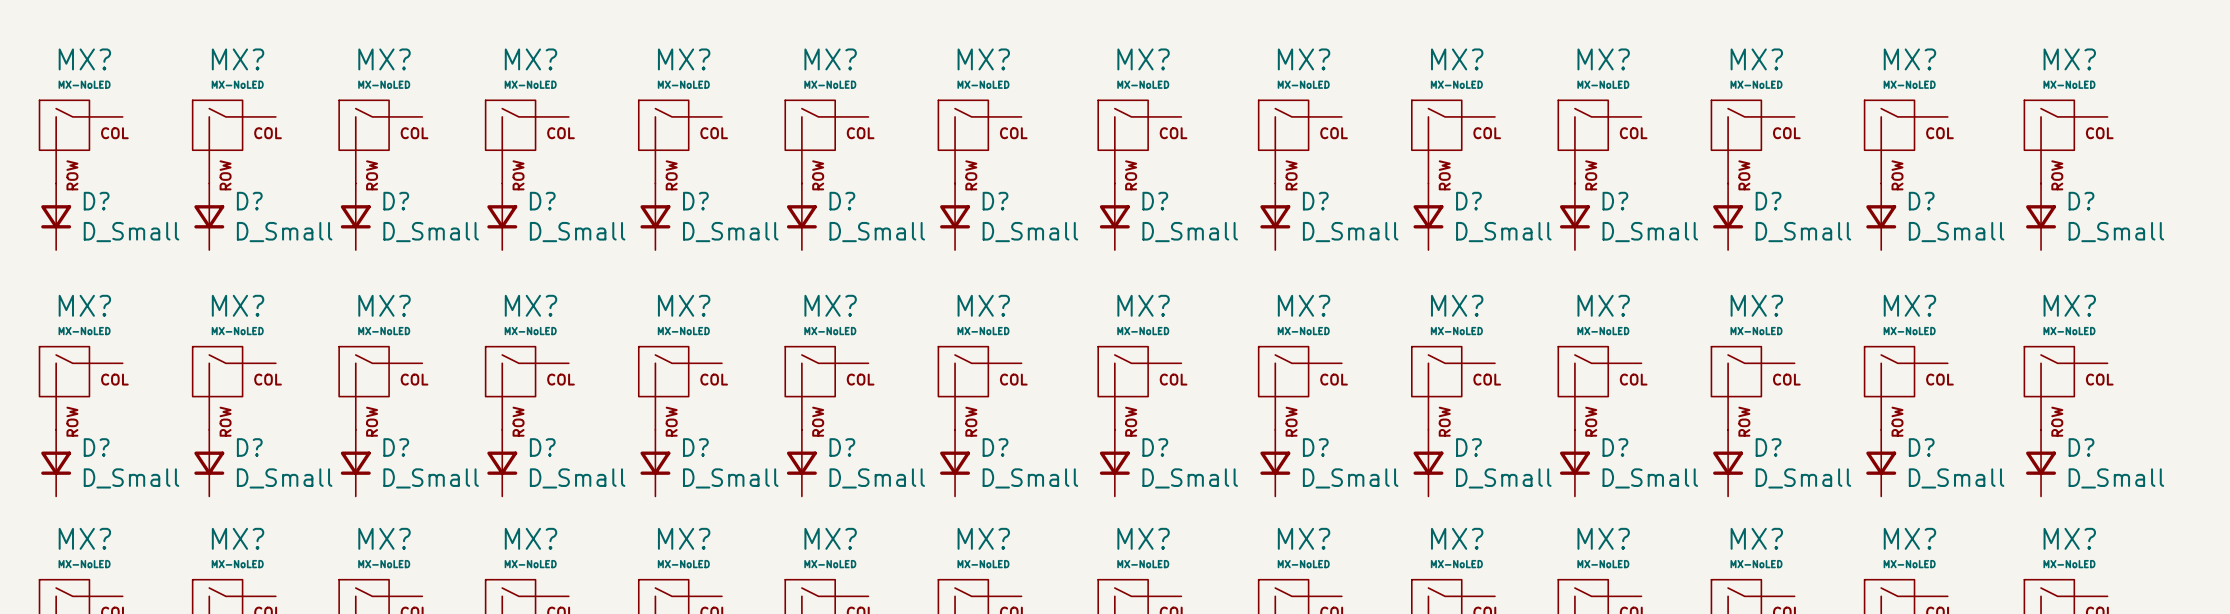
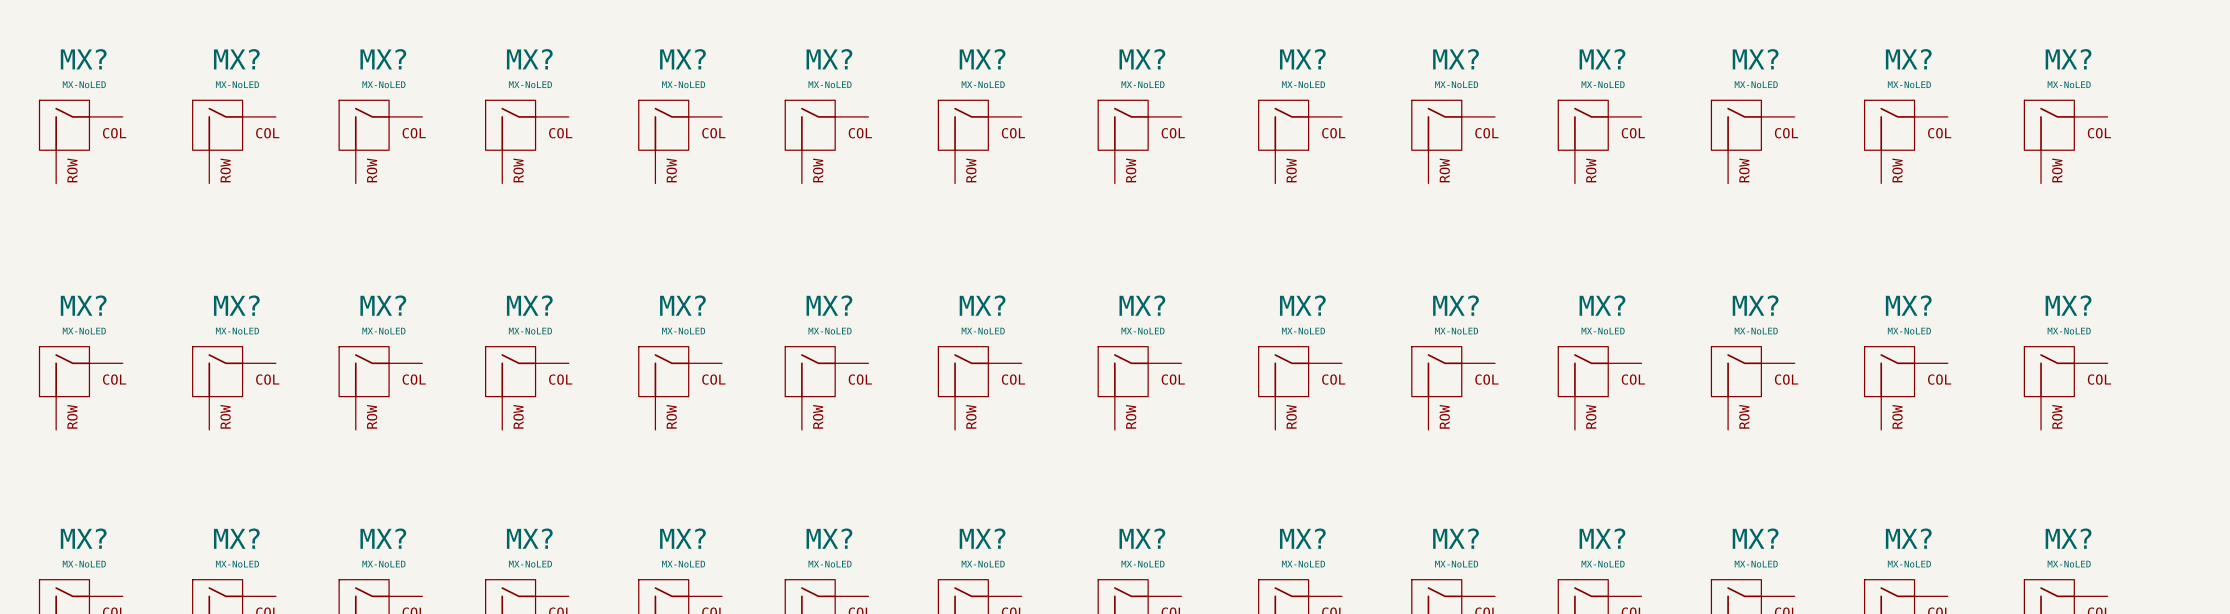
D?: D_Small (56, 216) -> none
D?: D_Small (209, 216) -> none
D?: D_Small (355, 216) -> none
D?: D_Small (502, 216) -> none
D?: D_Small (655, 216) -> none
D?: D_Small (801, 216) -> none
D?: D_Small (955, 216) -> none
D?: D_Small (1114, 216) -> none
D?: D_Small (1275, 216) -> none
D?: D_Small (1428, 216) -> none
D?: D_Small (1574, 216) -> none
D?: D_Small (1728, 216) -> none
D?: D_Small (1881, 216) -> none
D?: D_Small (2041, 216) -> none
D?: D_Small (56, 463) -> none
D?: D_Small (209, 463) -> none
D?: D_Small (355, 463) -> none
D?: D_Small (502, 463) -> none
D?: D_Small (655, 463) -> none
D?: D_Small (801, 463) -> none
D?: D_Small (955, 463) -> none
D?: D_Small (1114, 463) -> none
D?: D_Small (1275, 463) -> none
D?: D_Small (1428, 463) -> none
D?: D_Small (1574, 463) -> none
D?: D_Small (1728, 463) -> none
D?: D_Small (1881, 463) -> none
D?: D_Small (2041, 463) -> none

